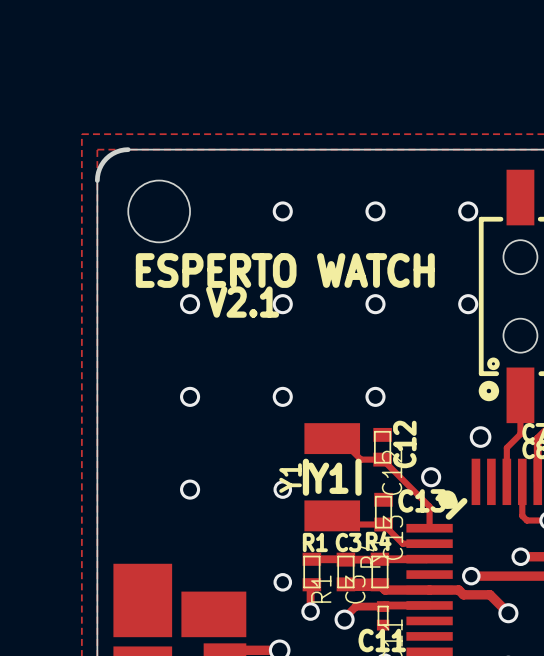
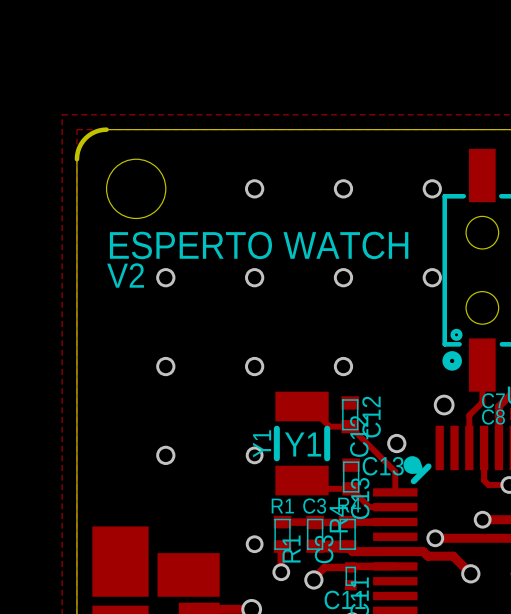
text: none -> V2 (125, 275)
text: V2.1 (242, 302) -> none

